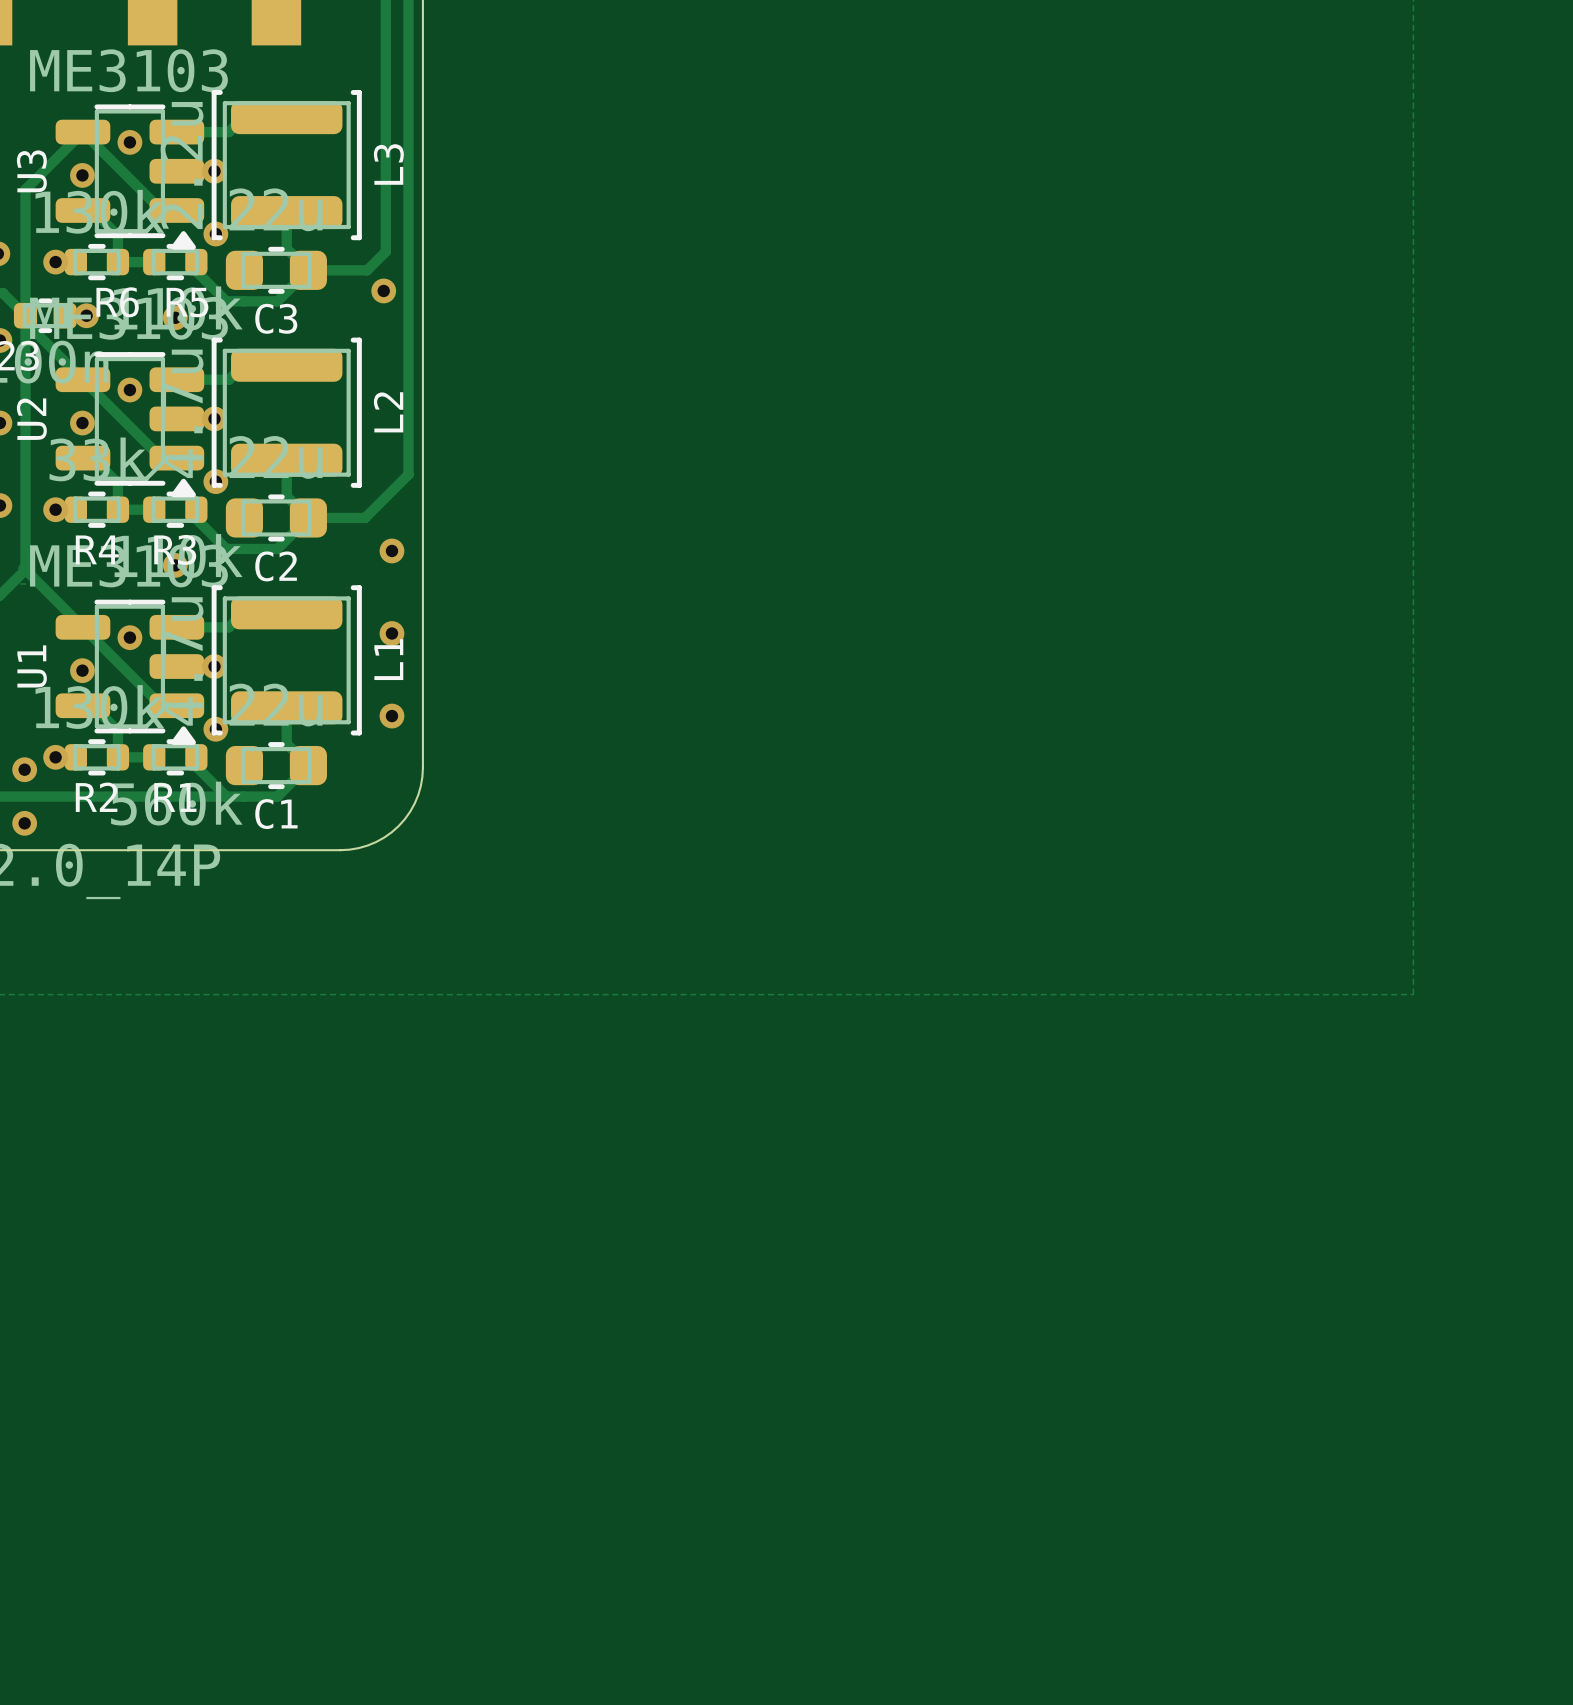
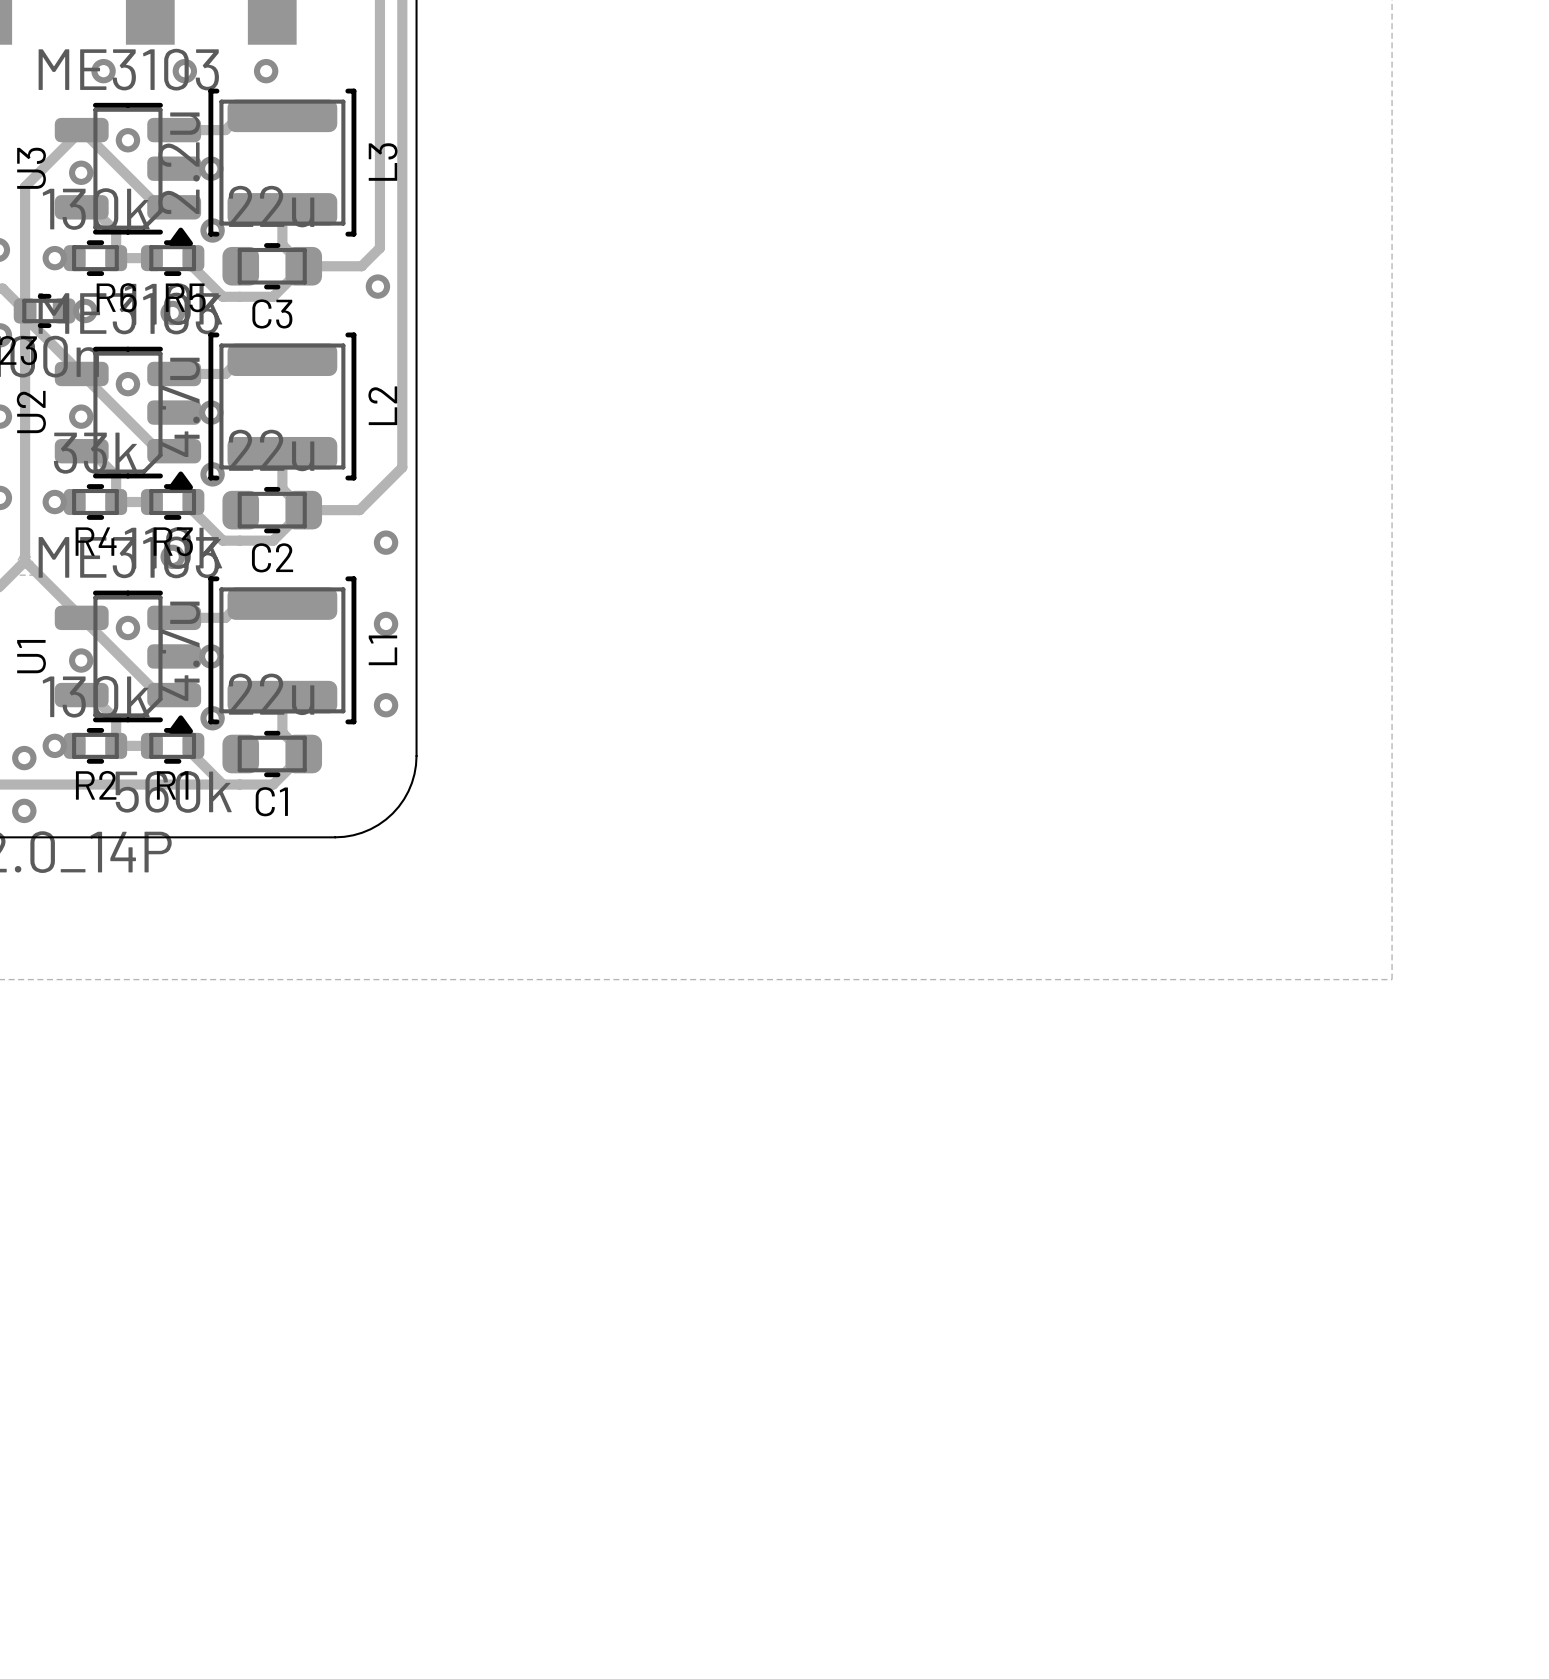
via: none -> (103, 71)
via: none -> (184, 71)
via: none -> (266, 71)

